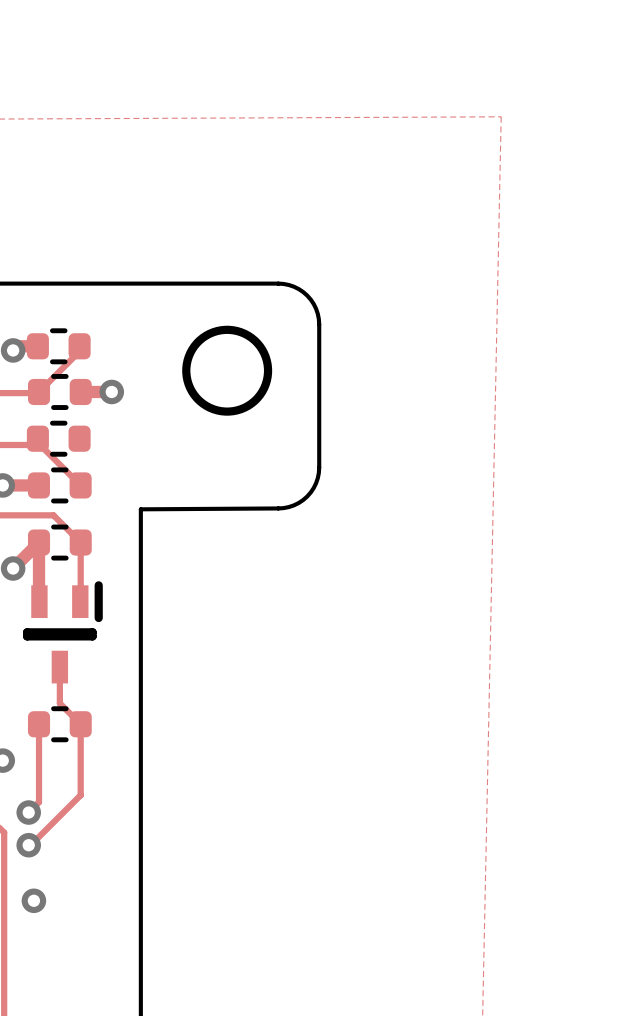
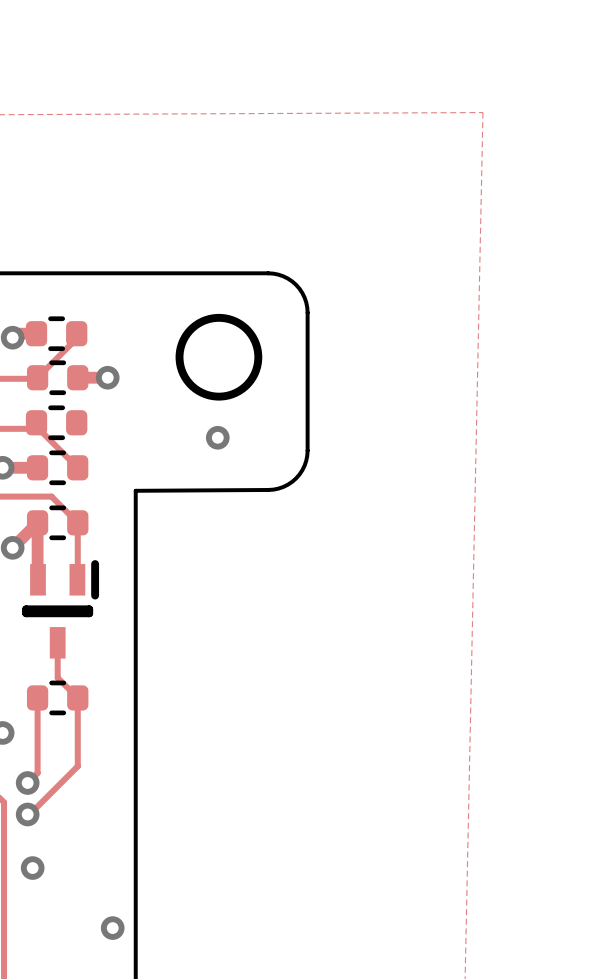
via: none -> (217, 437)
via: none -> (112, 928)

